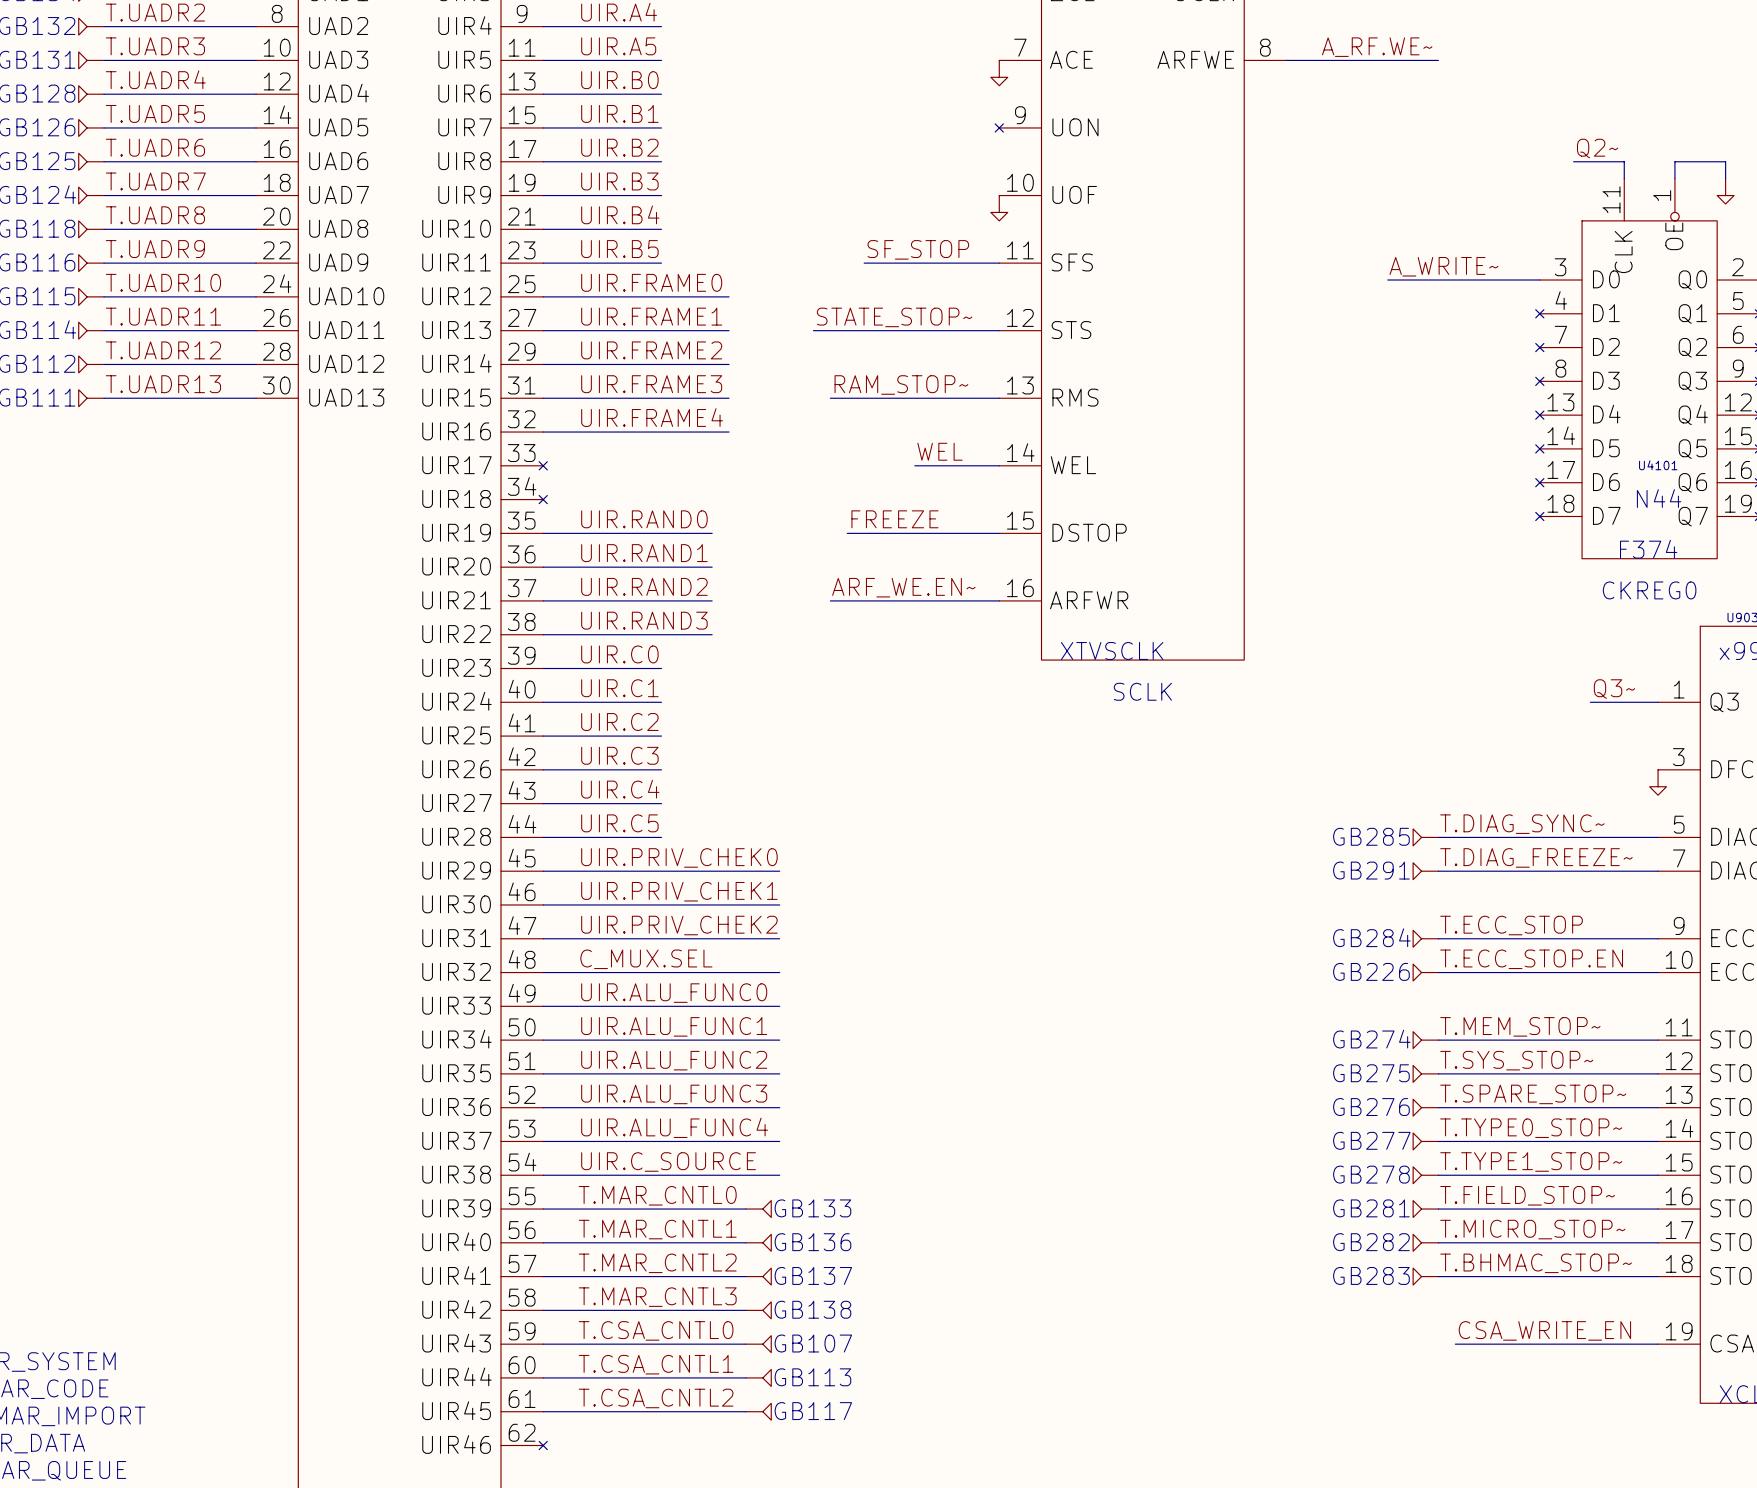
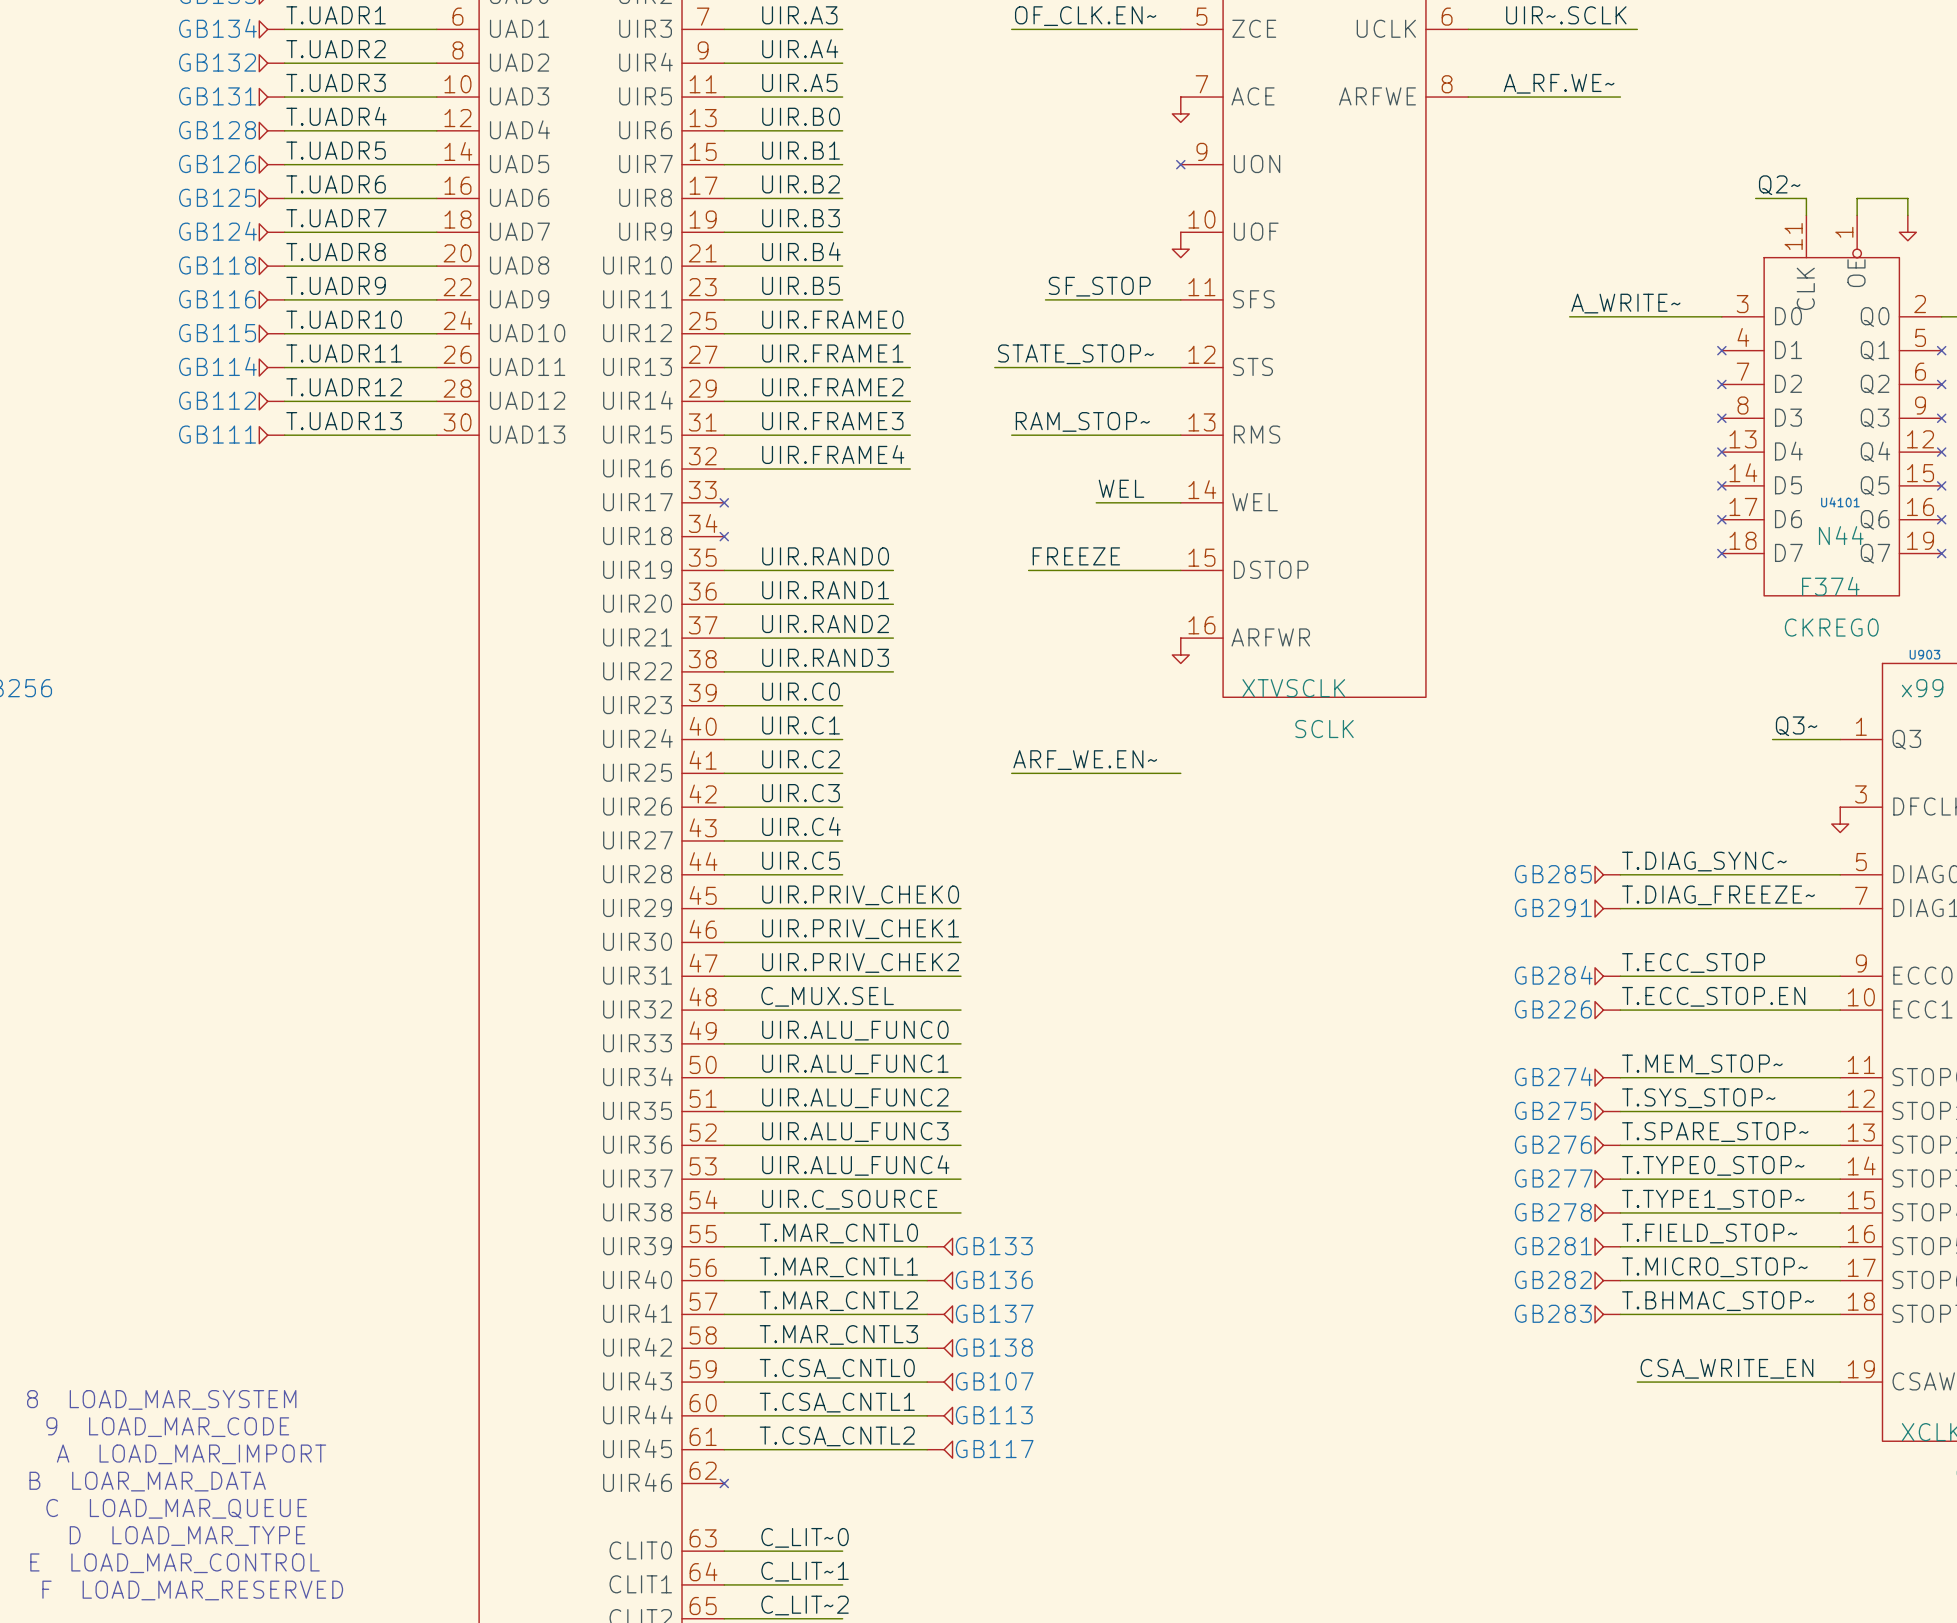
label position: ARF_WE.EN~ (903, 587) -> ARF_WE.EN~ (1085, 760)
wire: (830, 600) (999, 600) -> (1011, 773) (1180, 773)
power symbol: none -> (1180, 651)

